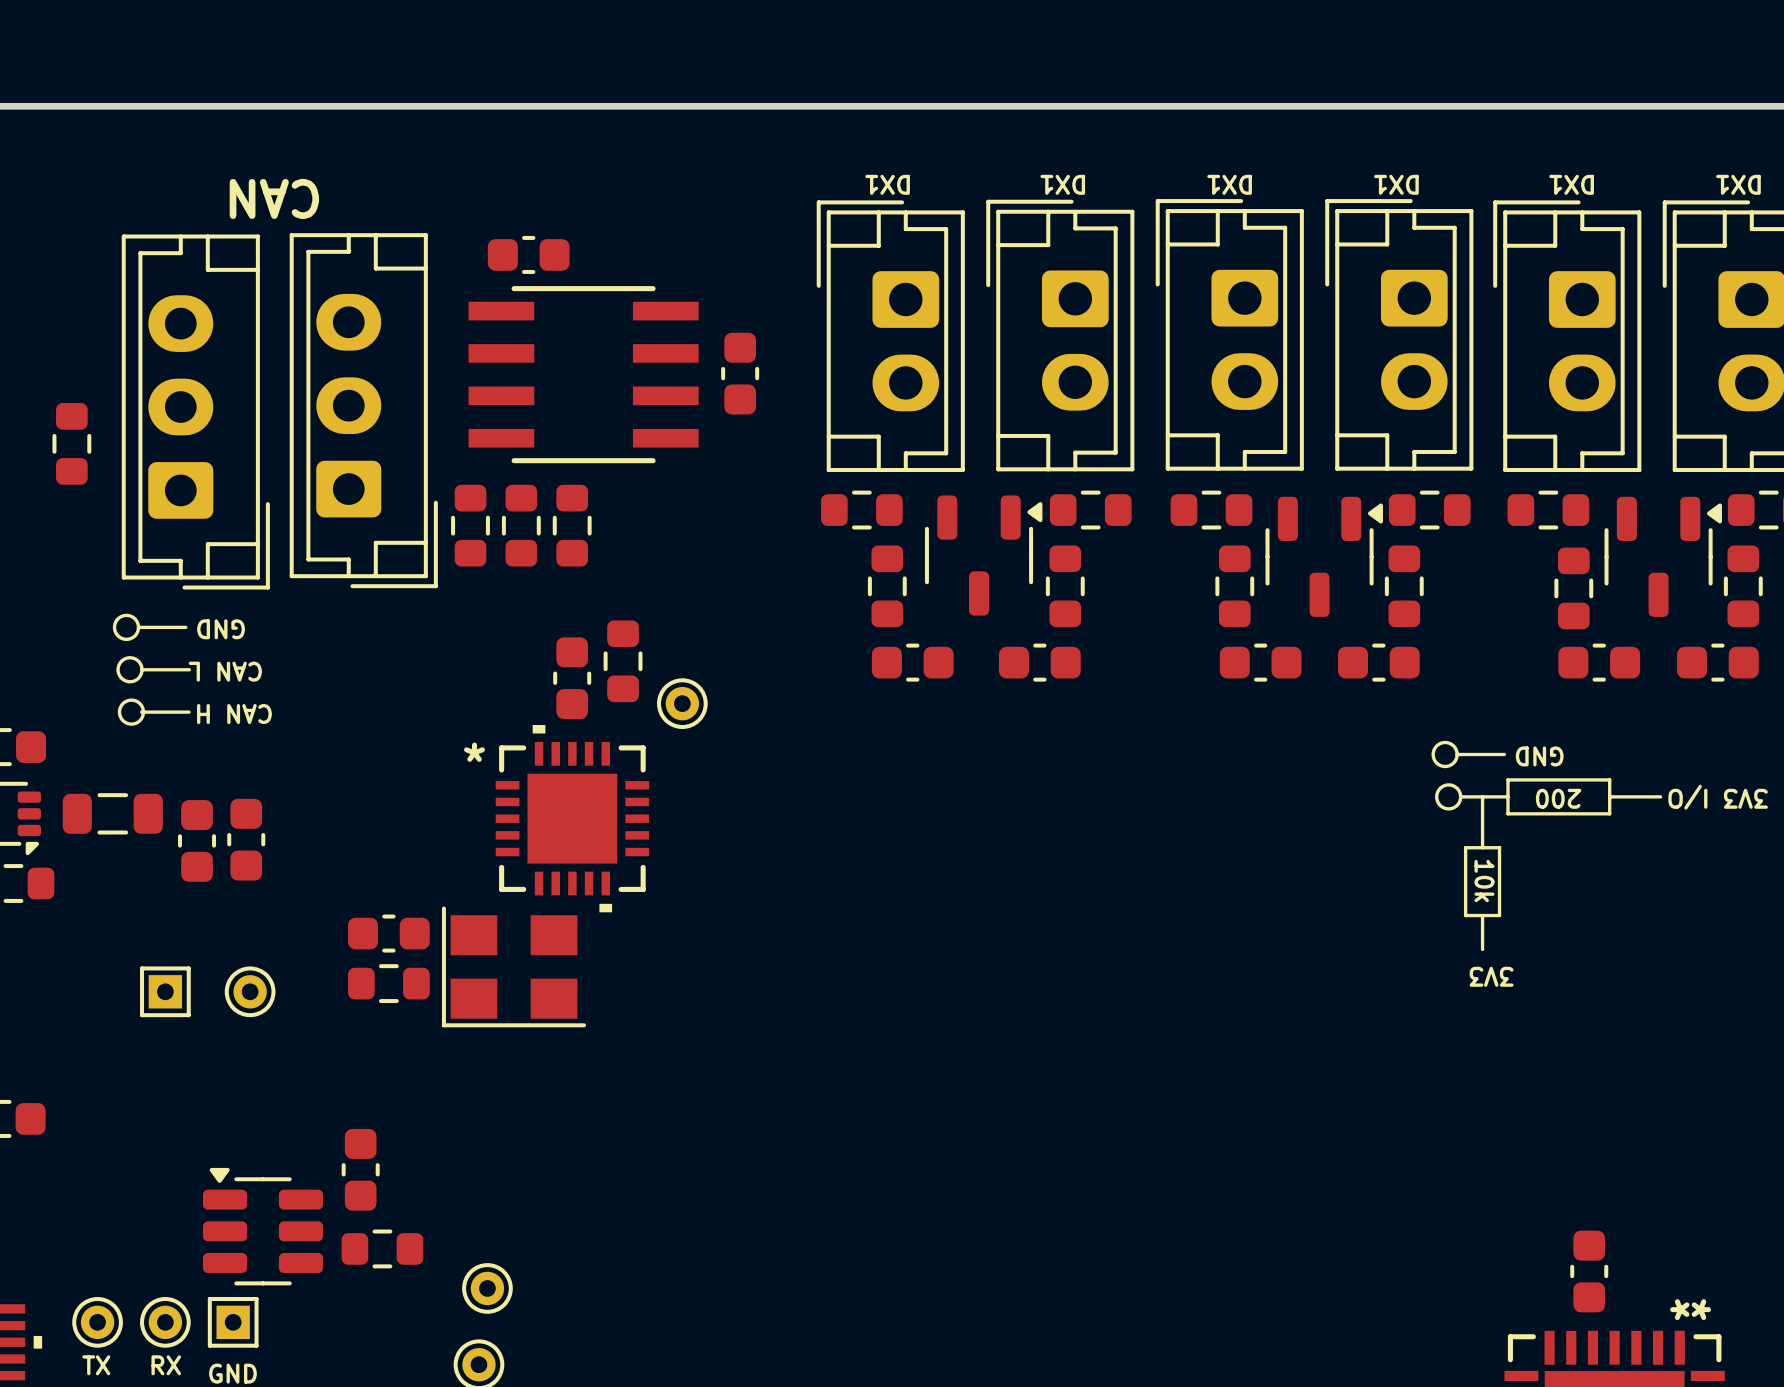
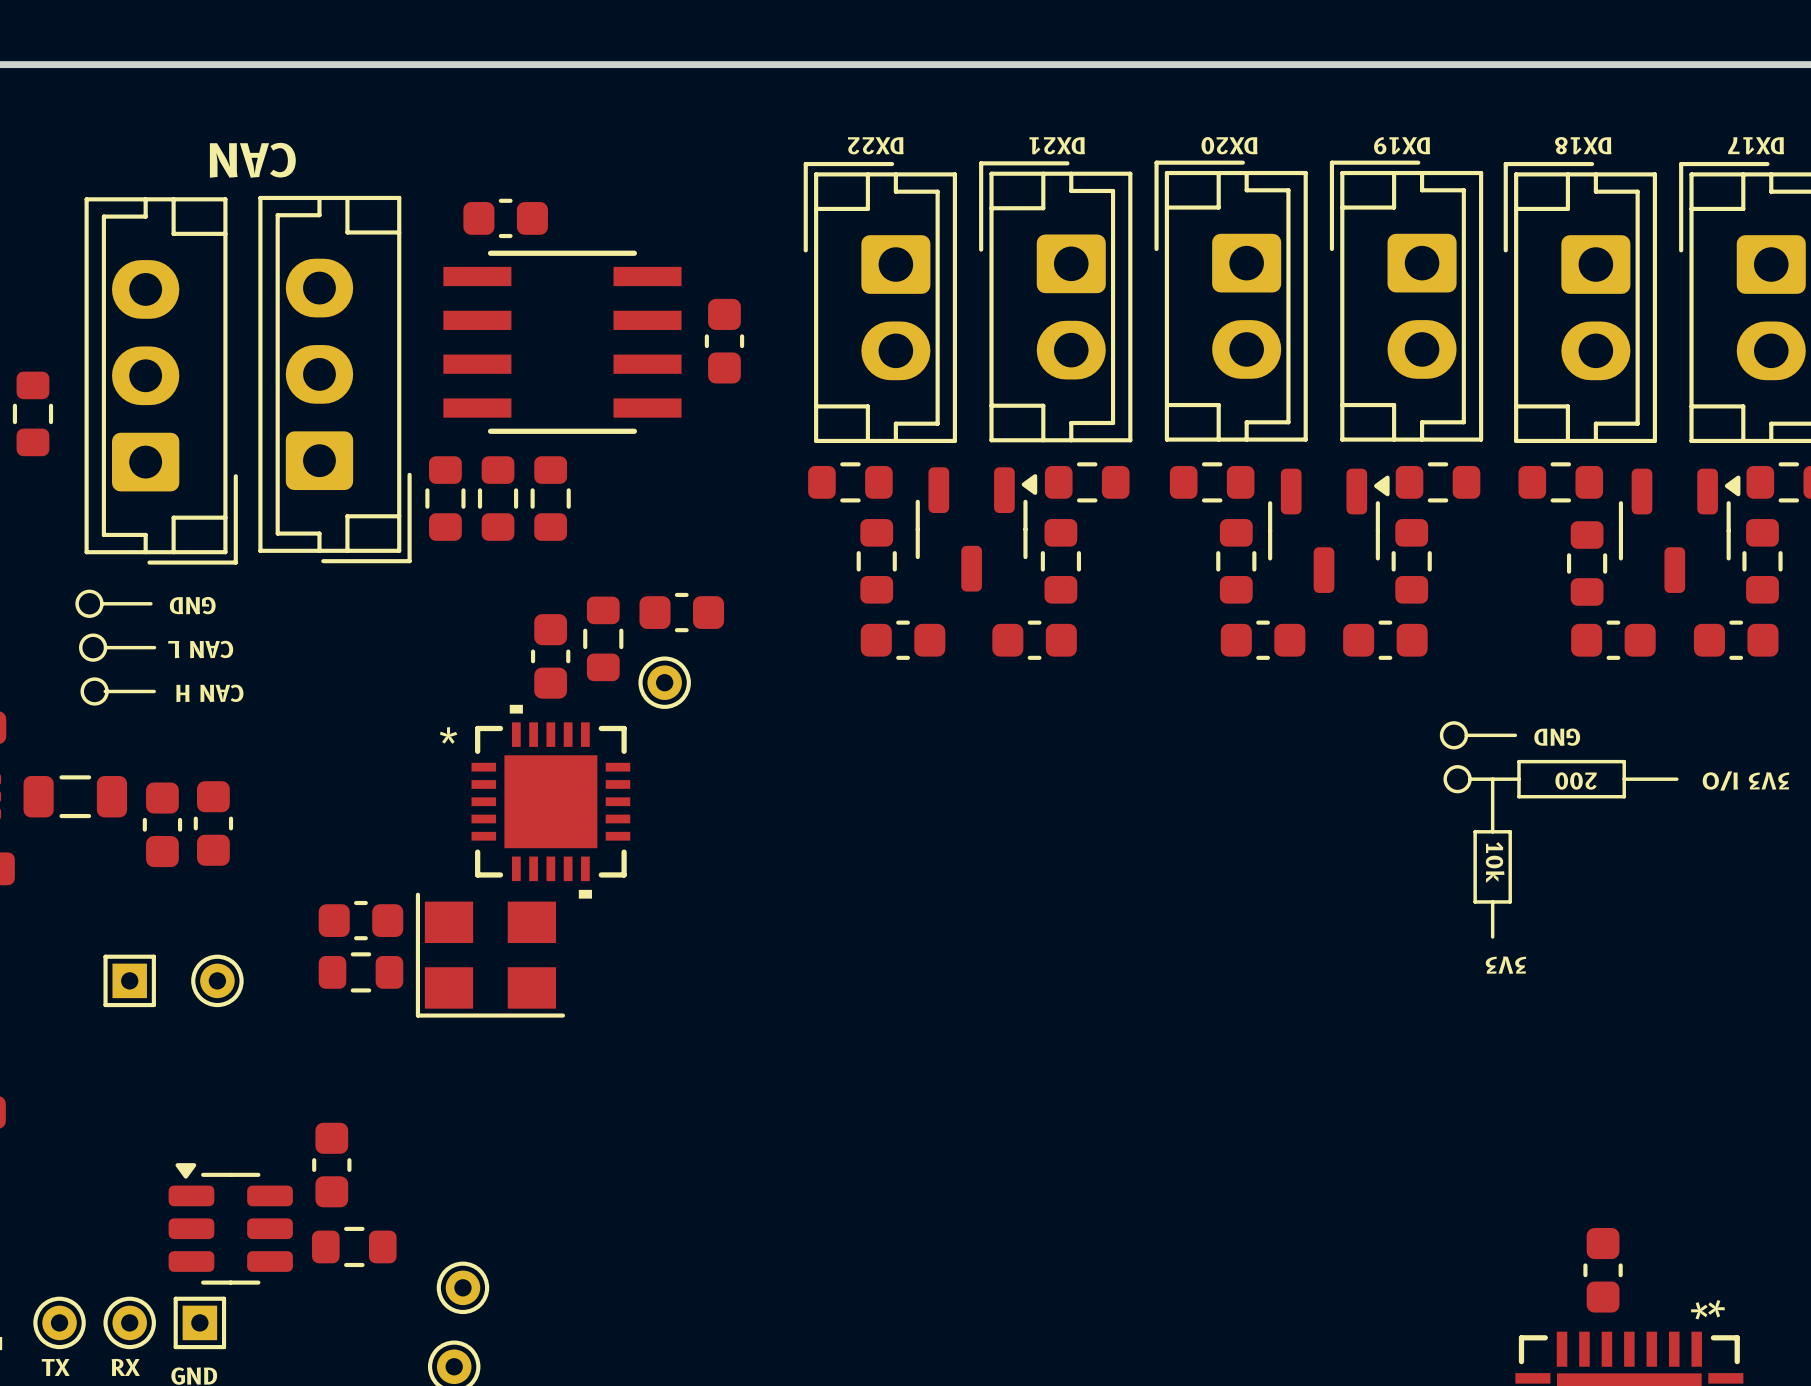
text: DX1 (887, 184) -> DX22 (875, 145)
text: DX1 (1062, 184) -> DX21 (1057, 145)
text: DX1 (1229, 184) -> DX20 (1229, 145)
text: DX1 (1396, 184) -> DX19 (1402, 145)
text: DX1 (1571, 184) -> DX18 (1583, 145)
text: DX1 (1738, 184) -> DX17 (1756, 145)
part: none -> (681, 612)

